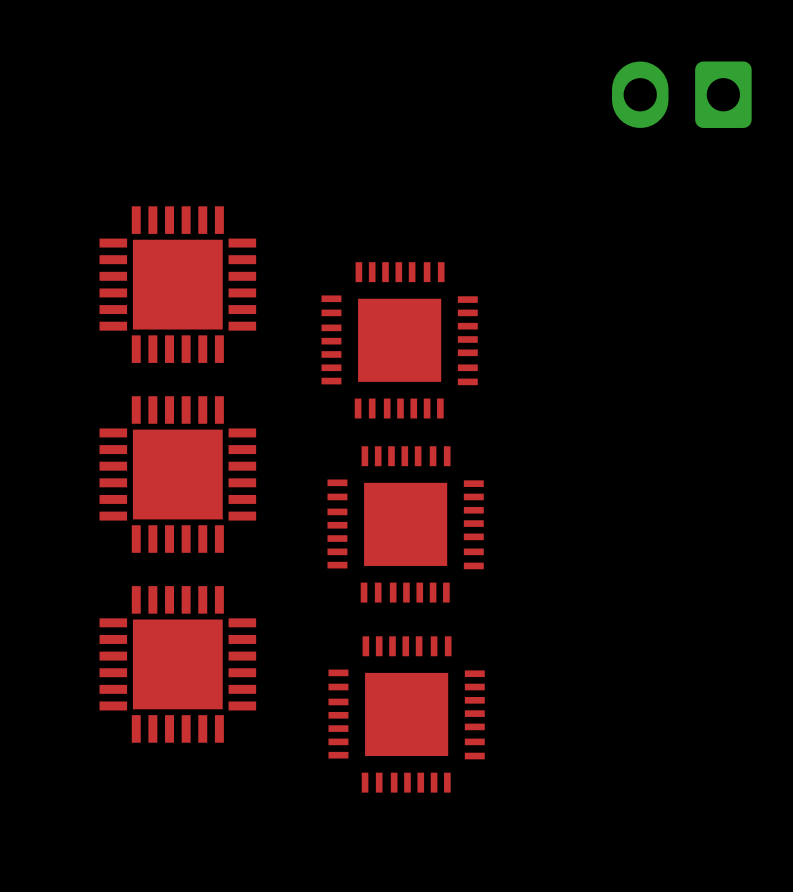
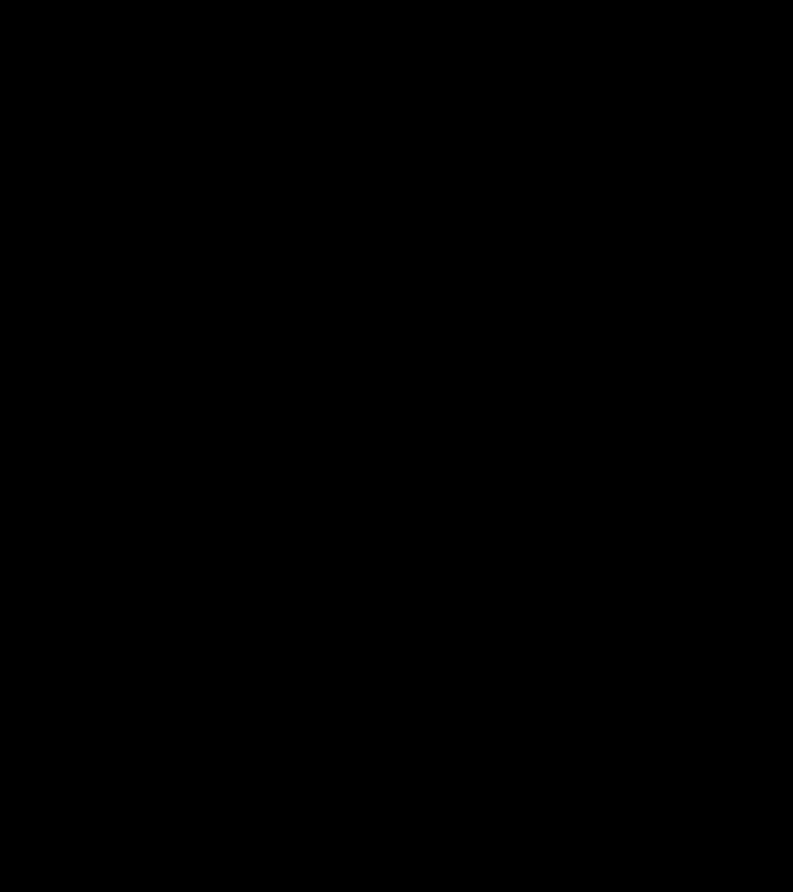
part: (681, 94) -> none
part: (177, 284) -> none
part: (399, 340) -> none
part: (177, 474) -> none
part: (405, 524) -> none
part: (177, 664) -> none
part: (406, 714) -> none

